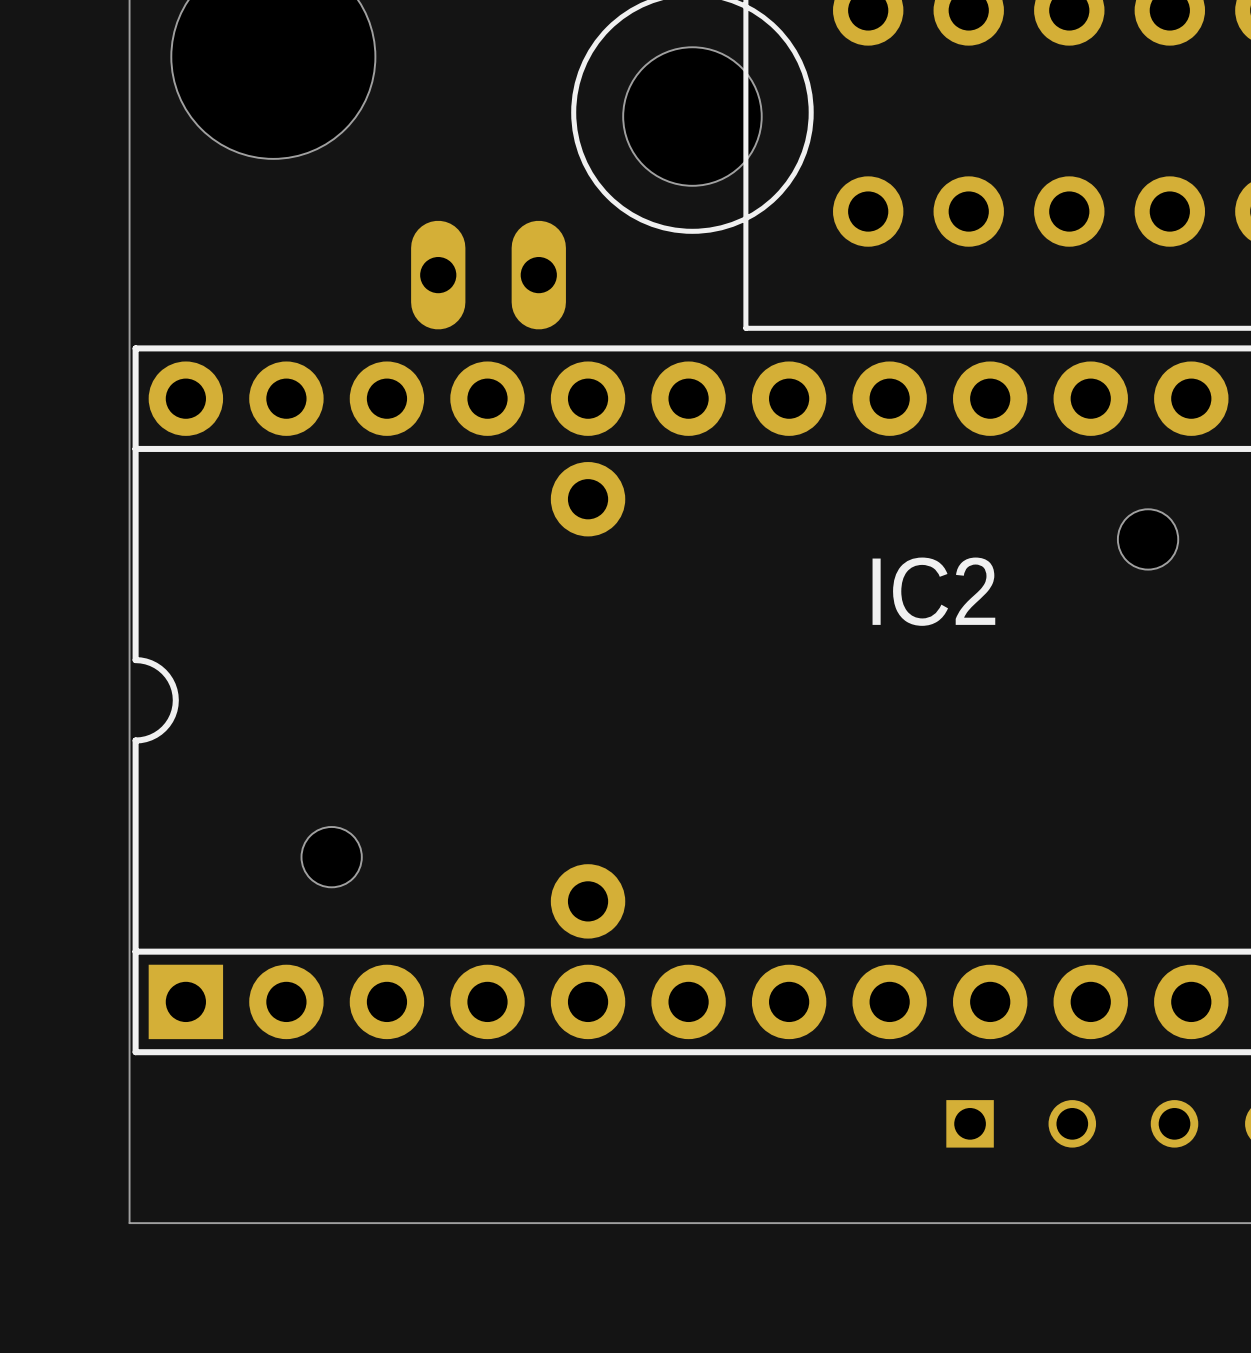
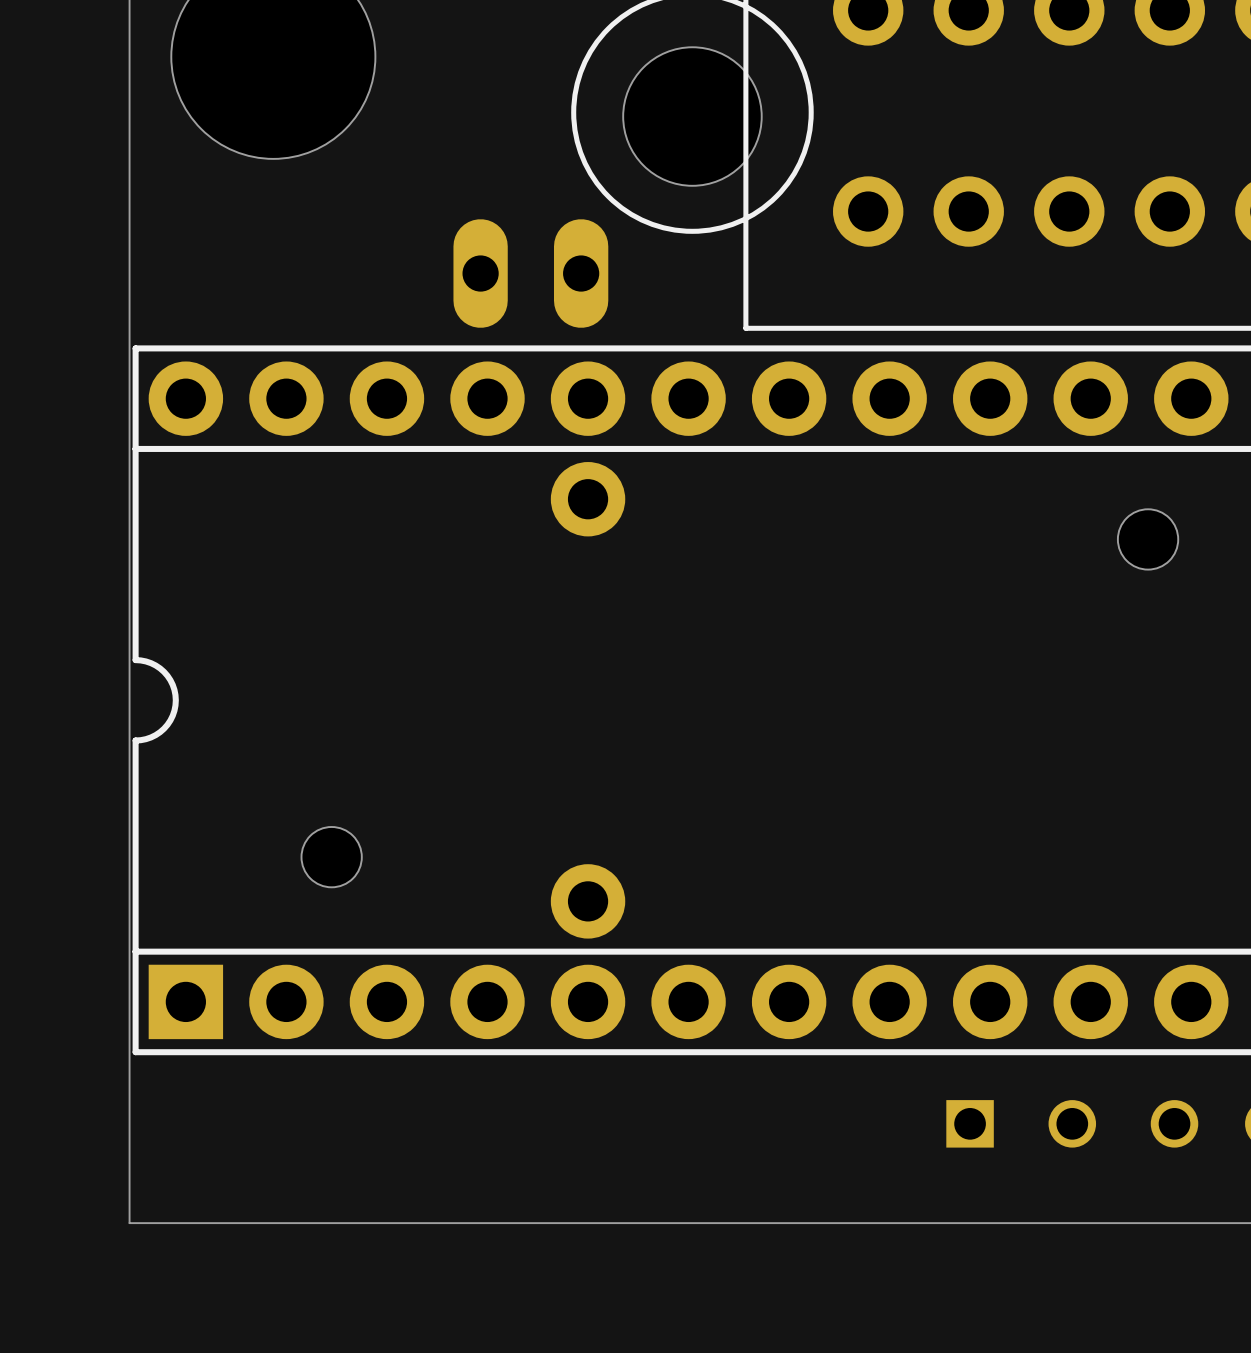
part position: (488, 275) -> (530, 273)
part value: IC2 (933, 591) -> none

